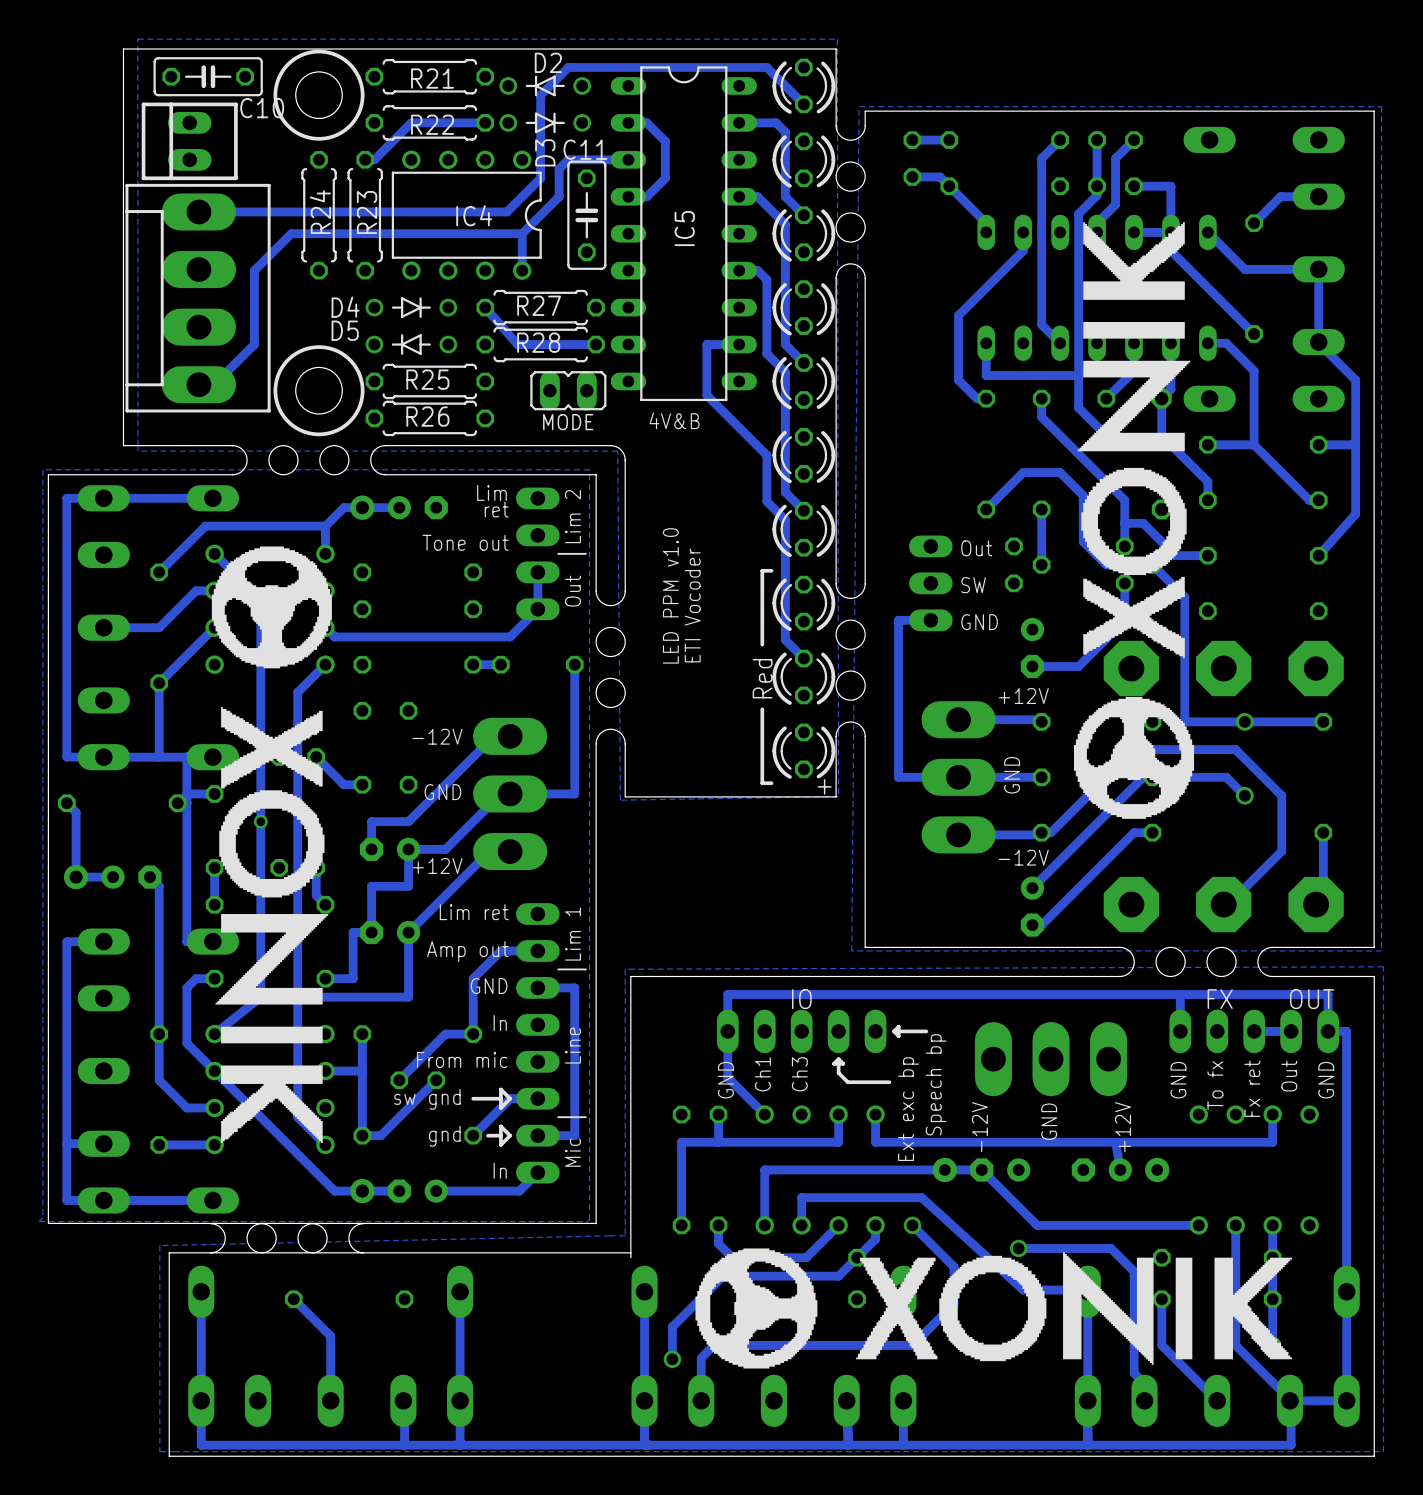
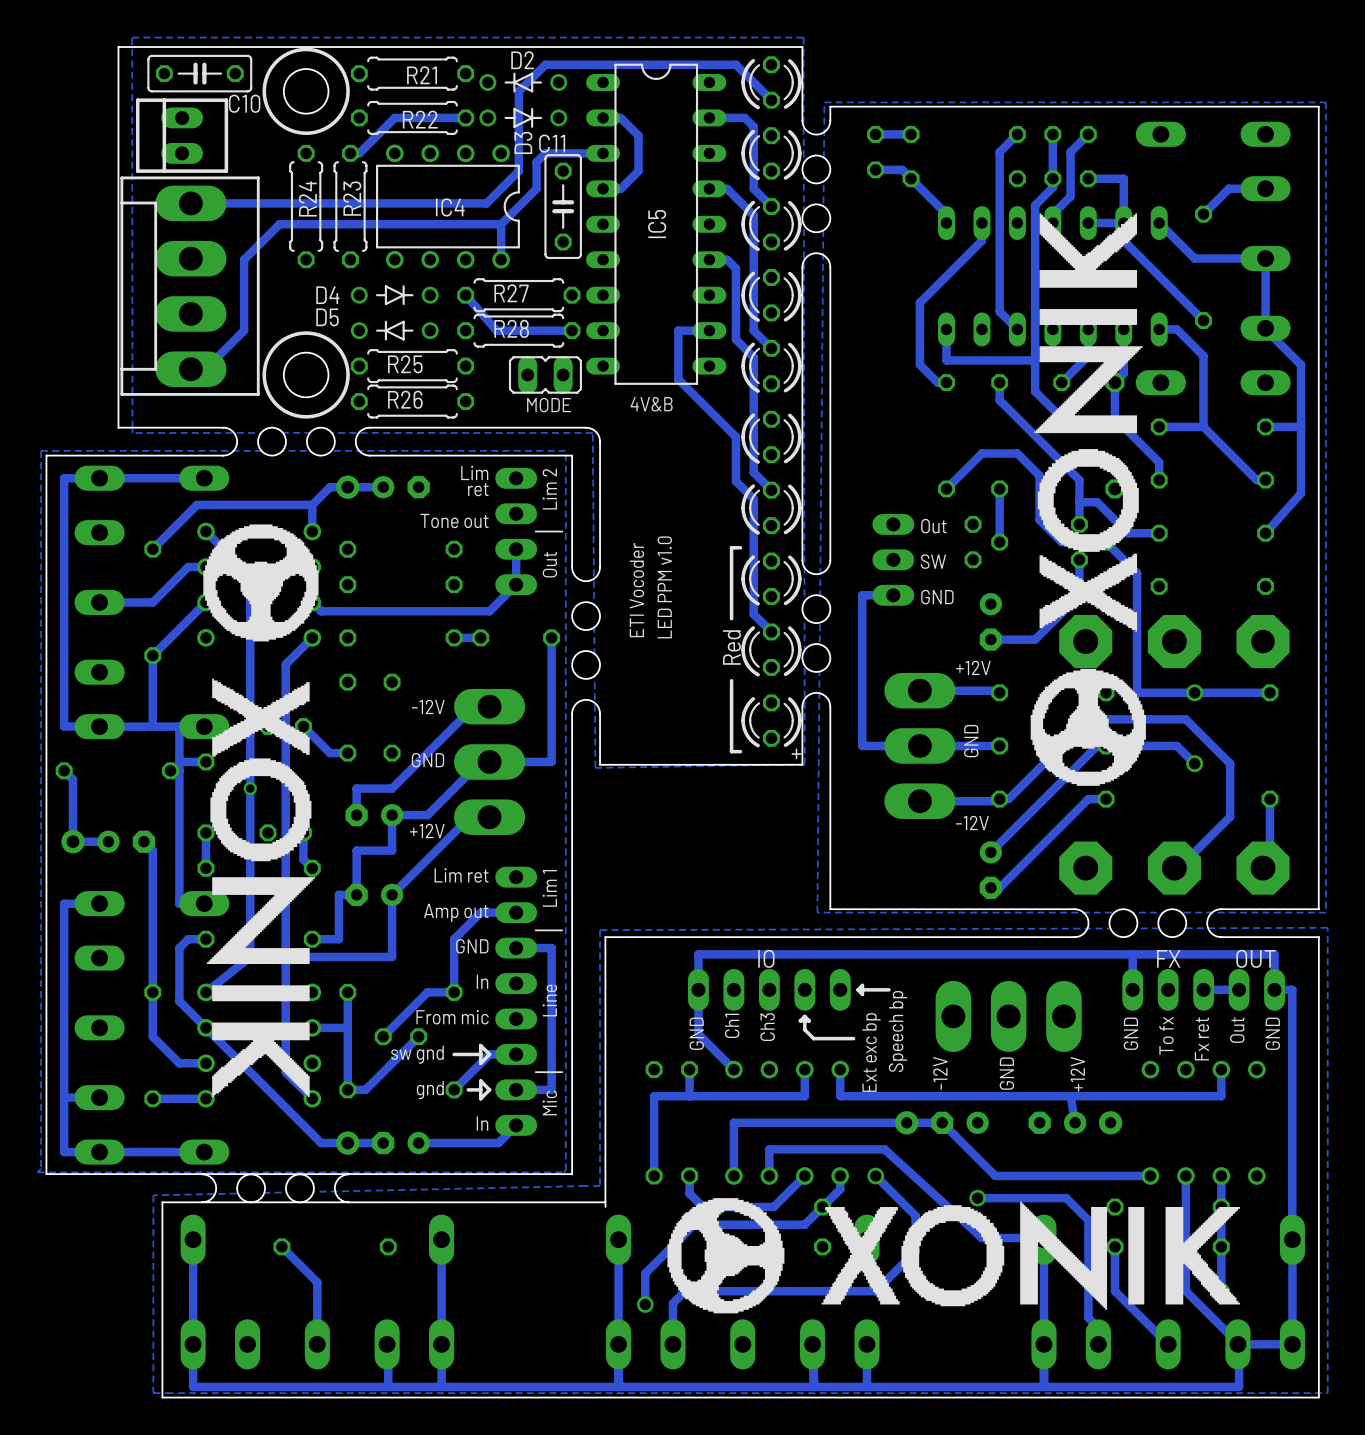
text: LED PPM v1.0 (670, 595) -> ETI Vocoder (636, 590)
text: ETI Vocoder (692, 605) -> LED PPM v1.0 (664, 587)

